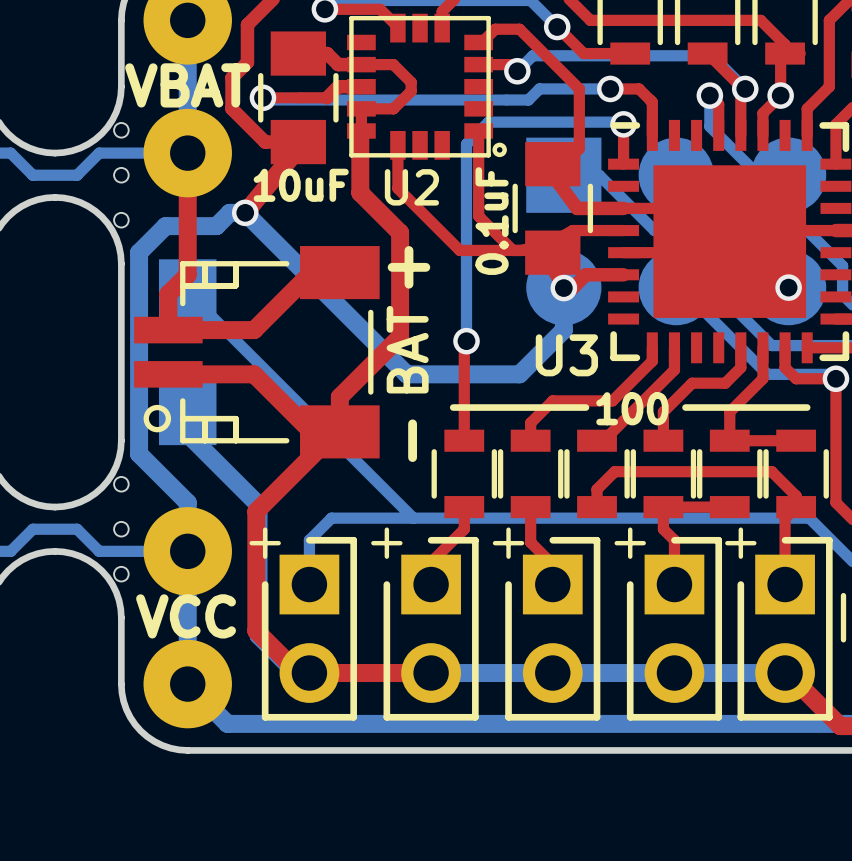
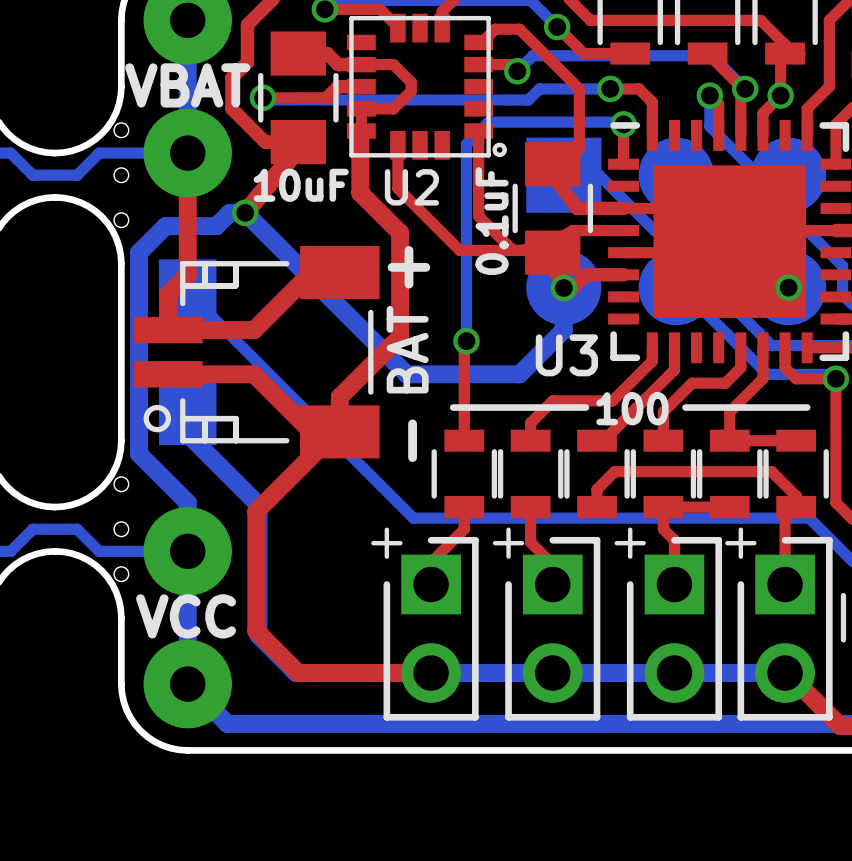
bottom track: (413, 518) (331, 518) (309, 540) (309, 584) -> none
part: (309, 628) -> none

